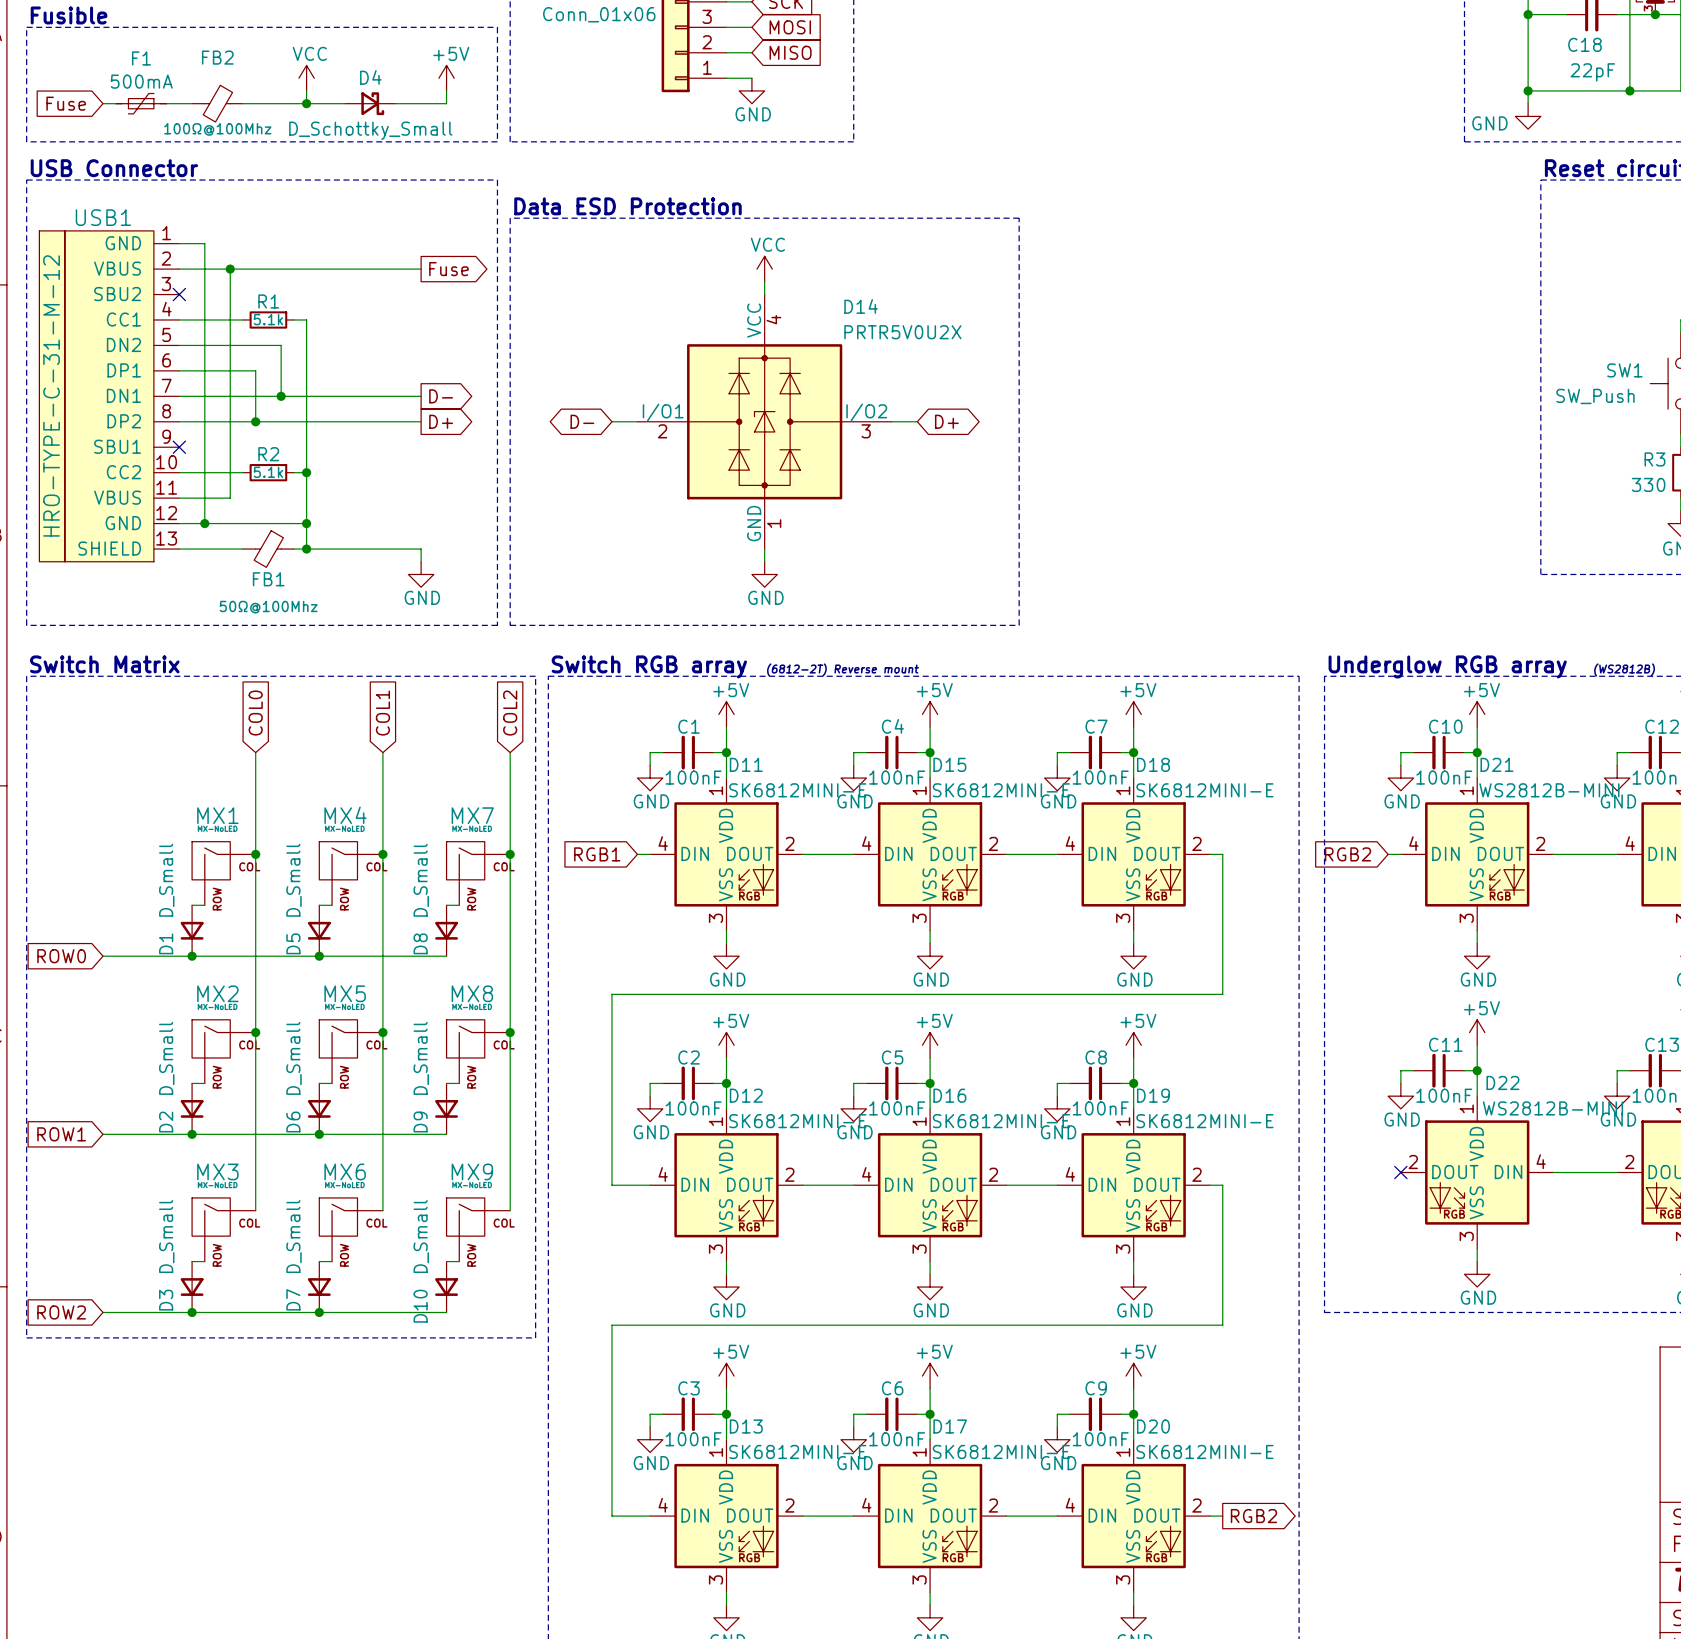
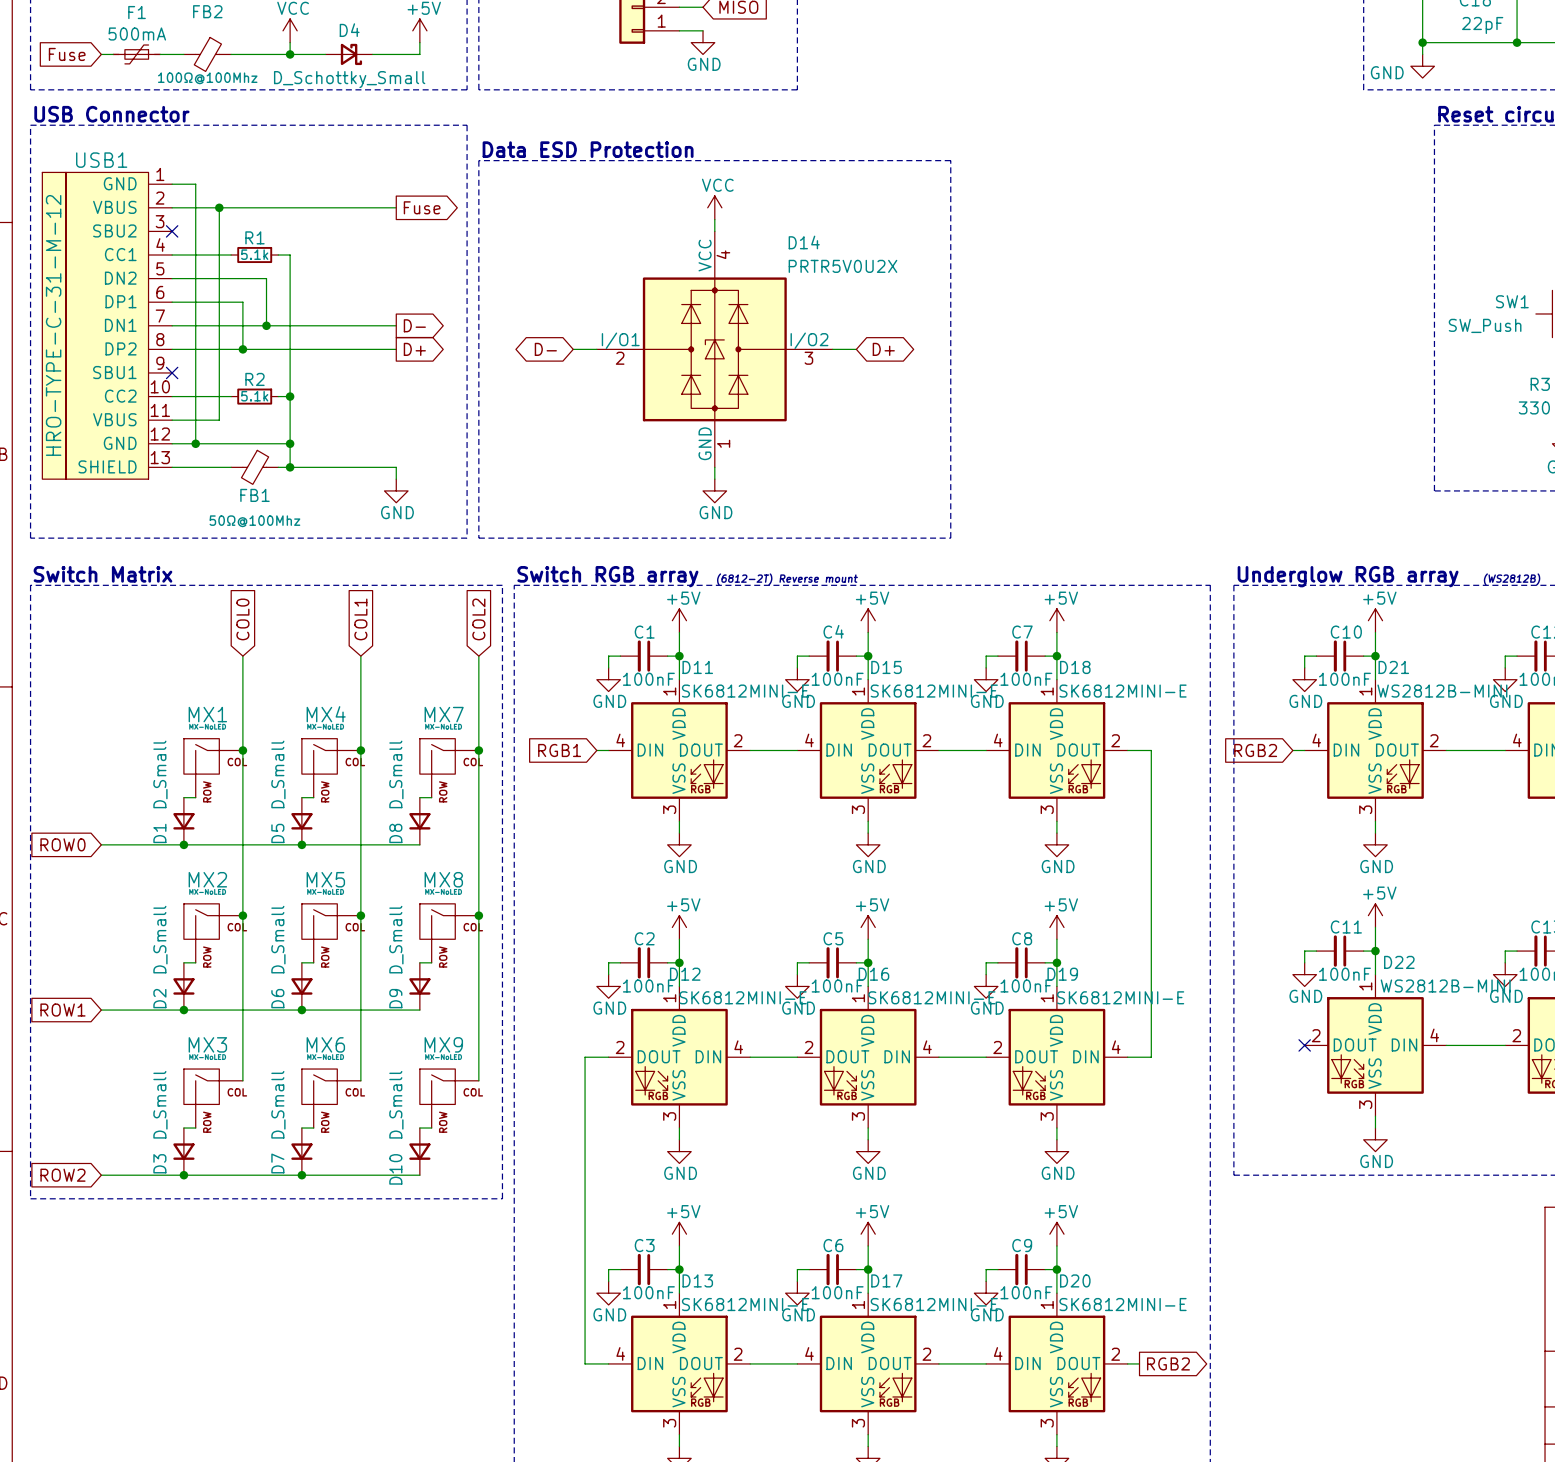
wire: (1222, 854) (1222, 994) (611, 994) (611, 1185) (624, 1185) -> (1139, 750) (1151, 750) (1151, 1057) (1139, 1057)
D12 value position: SK6812MINI-E (797, 1121) -> SK6812MINI-E (743, 997)
D16 value position: SK6812MINI-E (1001, 1121) -> SK6812MINI-E (931, 997)
D19 value position: SK6812MINI-E (1204, 1121) -> SK6812MINI-E (1120, 997)
D12 flip: as is (726, 1185) -> left-right (679, 1057)
D16 flip: as is (930, 1185) -> left-right (868, 1057)
D19 flip: as is (1133, 1185) -> left-right (1056, 1057)
wire: (1222, 1185) (1222, 1325) (611, 1325) (611, 1516) (624, 1516) -> (585, 1057) (585, 1363)

